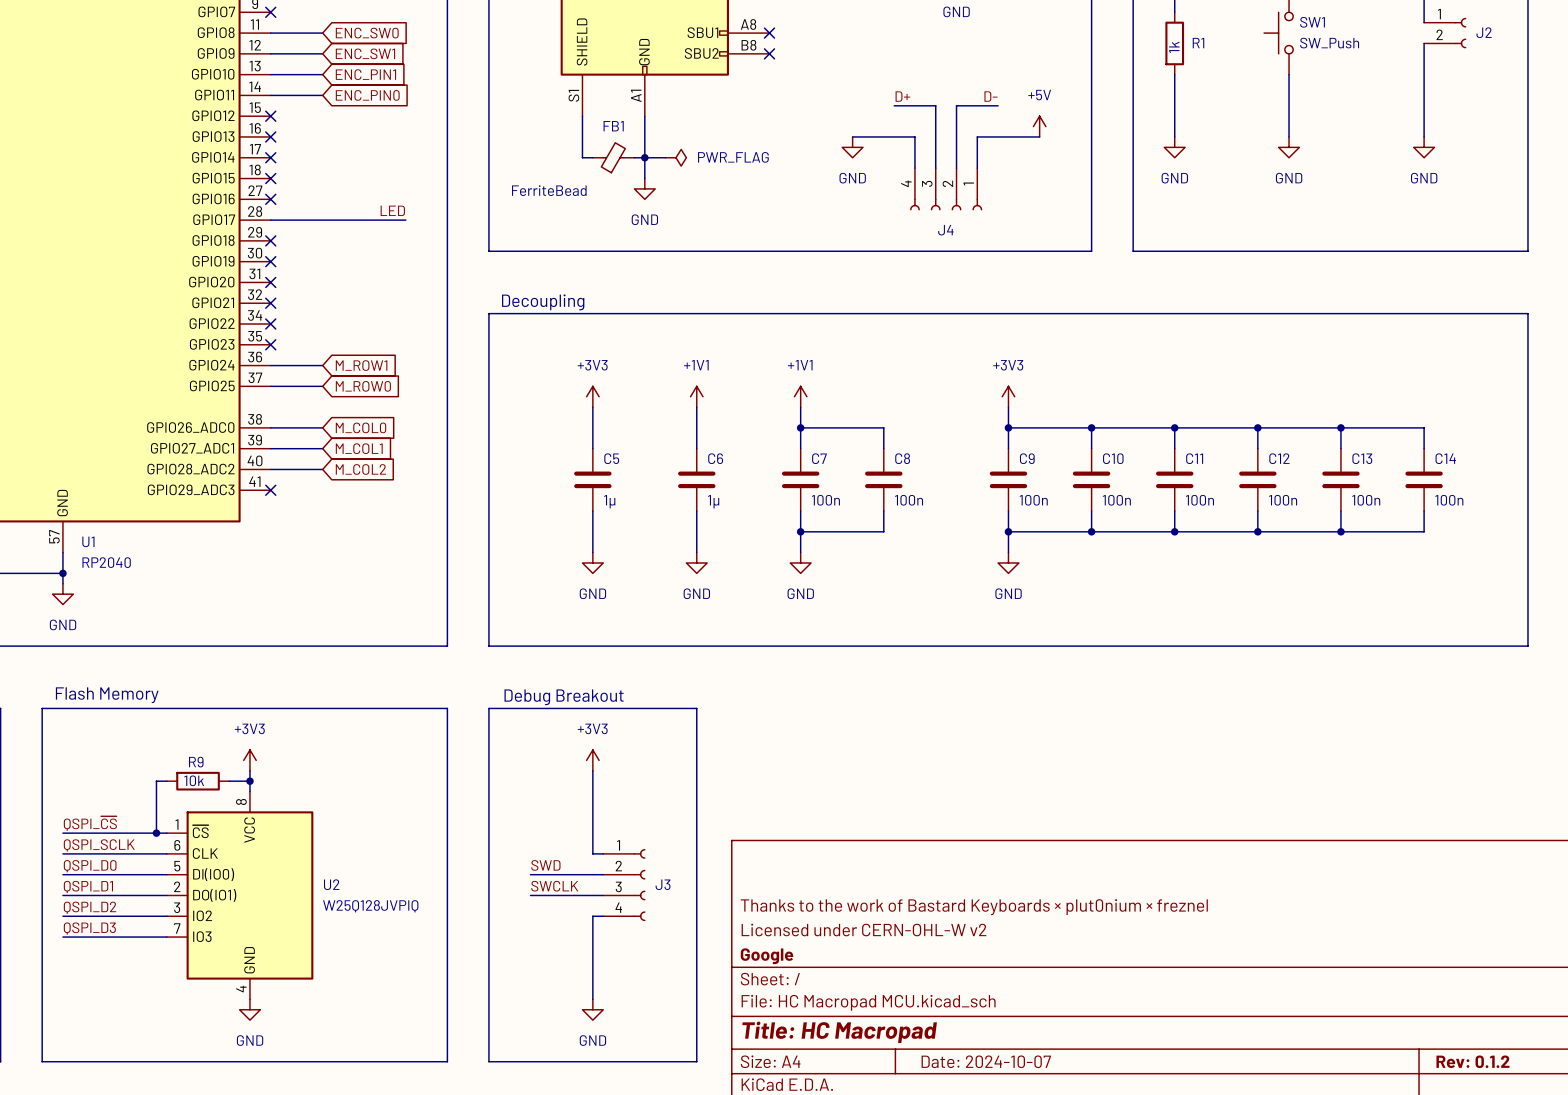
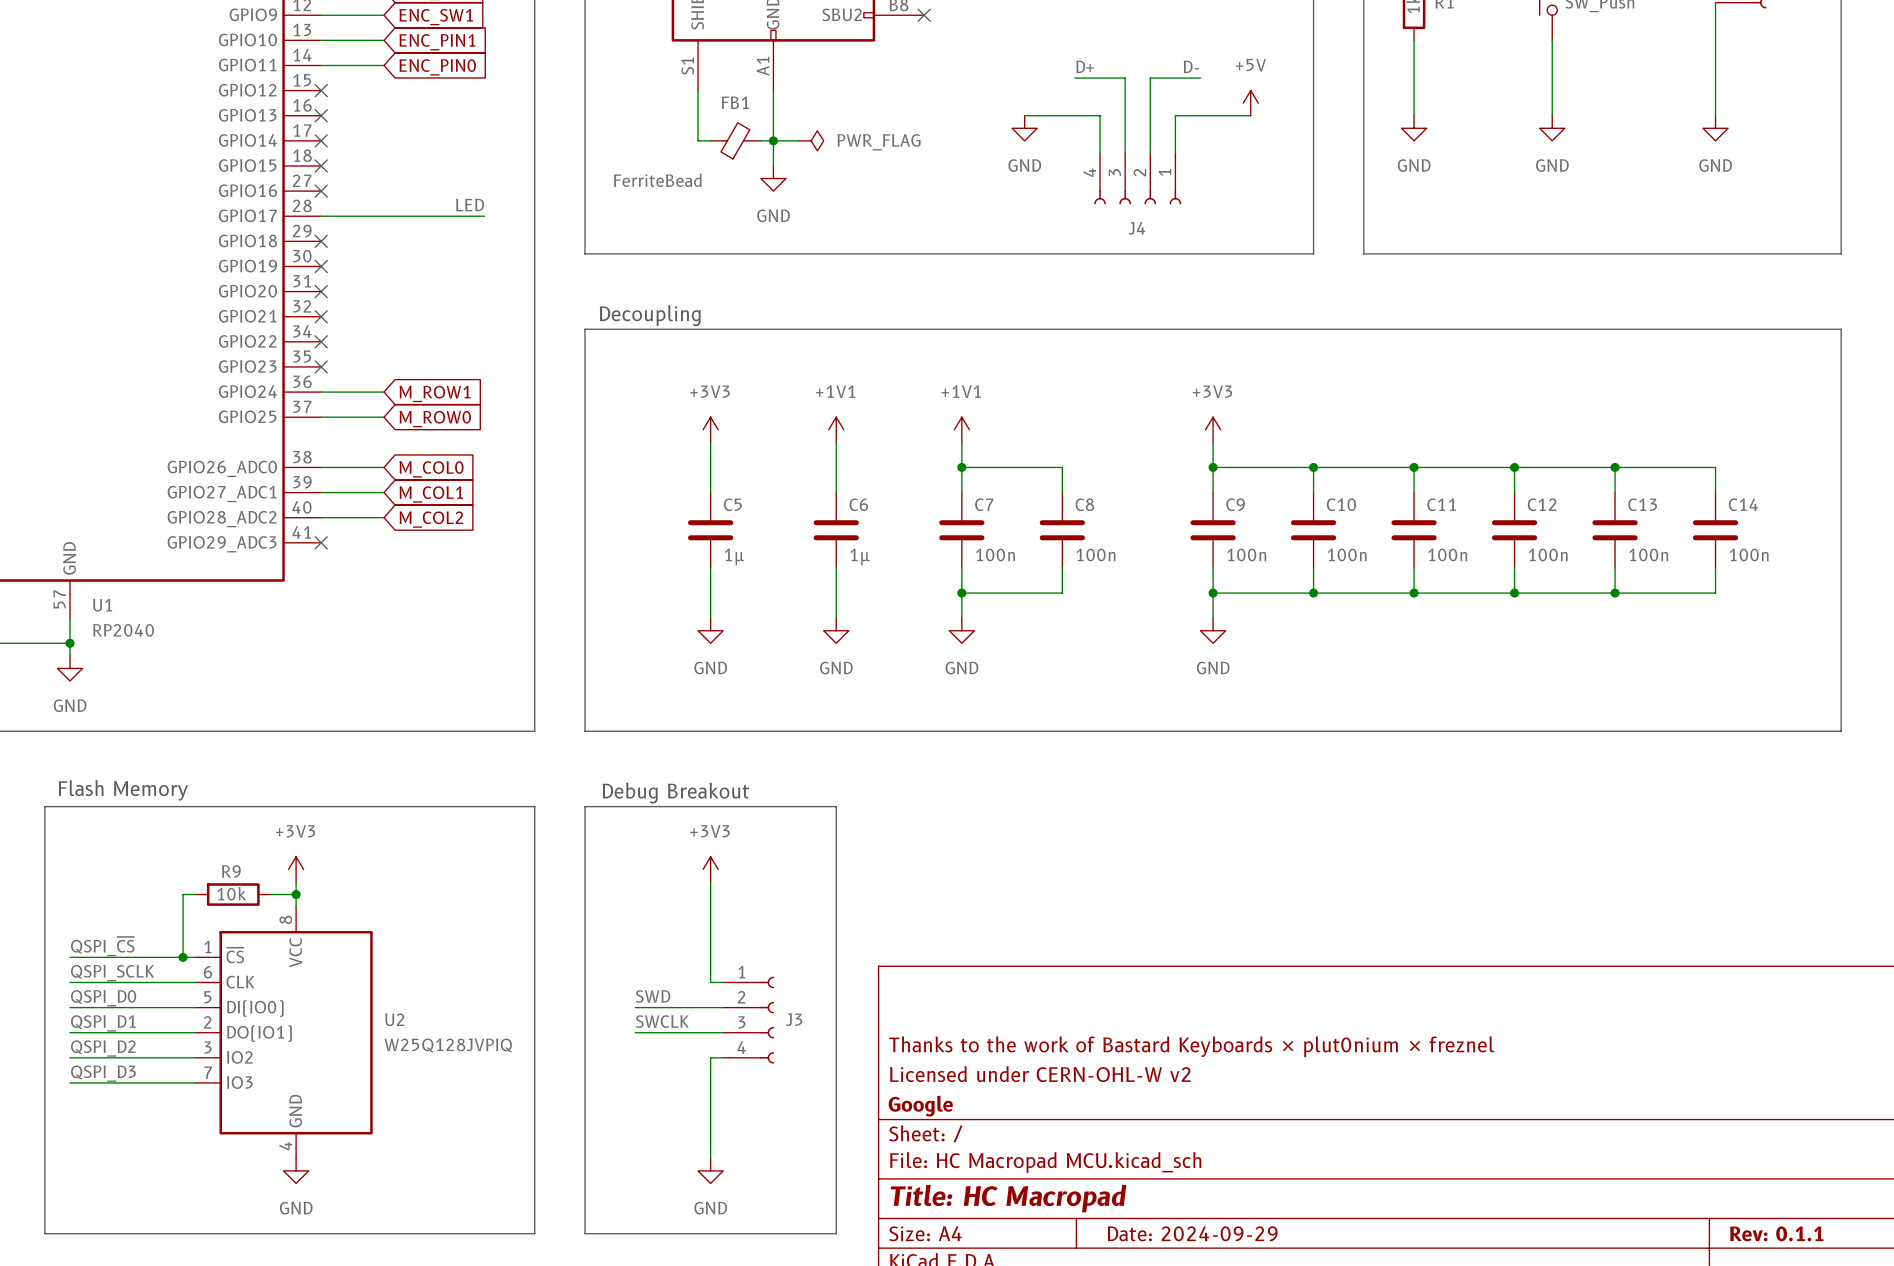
title block: Date: 2024-10-07 (986, 1061) -> Date: 2024-09-29 (1192, 1233)
title block: Rev: 0.1.2 (1472, 1061) -> Rev: 0.1.1 (1776, 1233)

